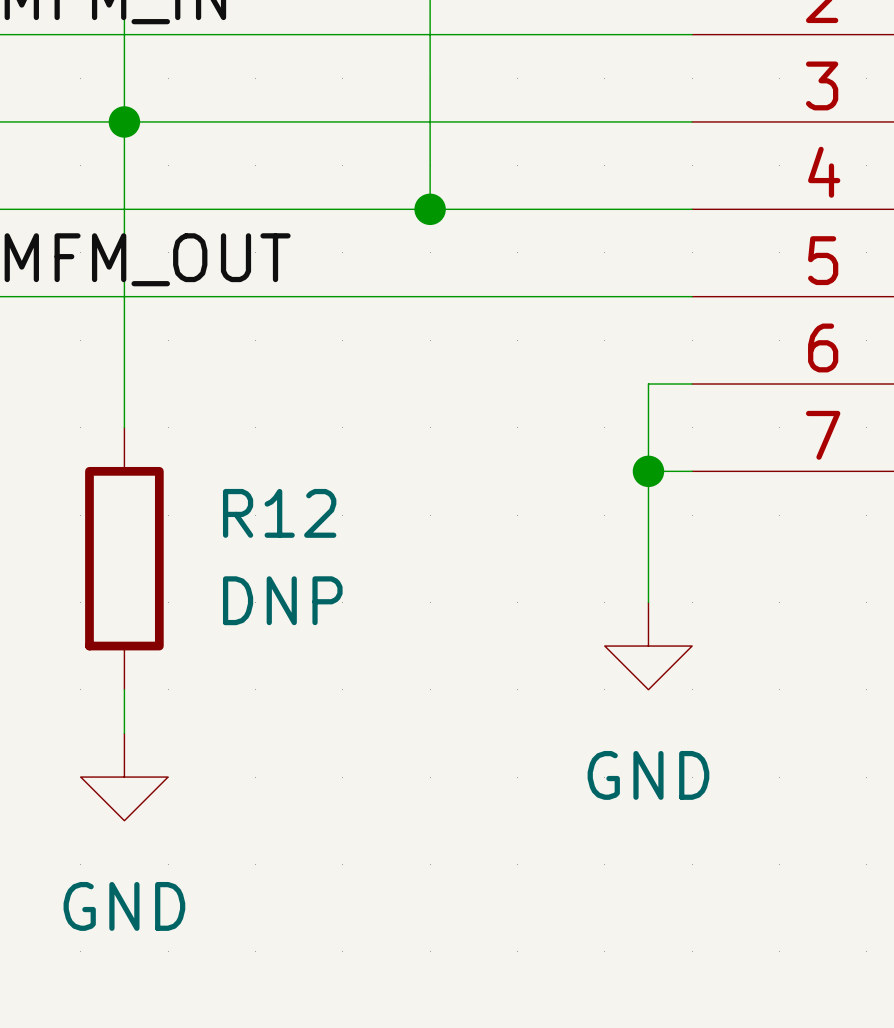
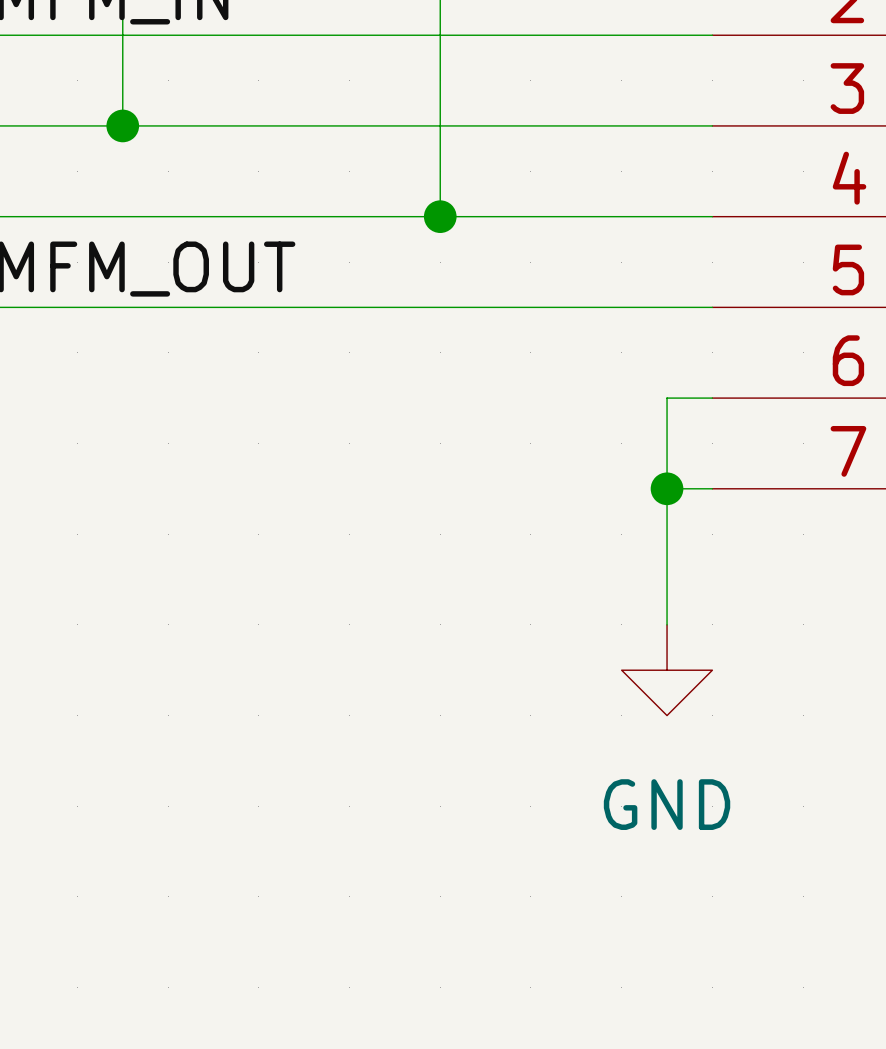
wire: (124, 121) (124, 427) -> none
R12: DNP (124, 558) -> none
wire: (124, 689) (124, 733) -> none
power symbol: GND (124, 777) -> none

